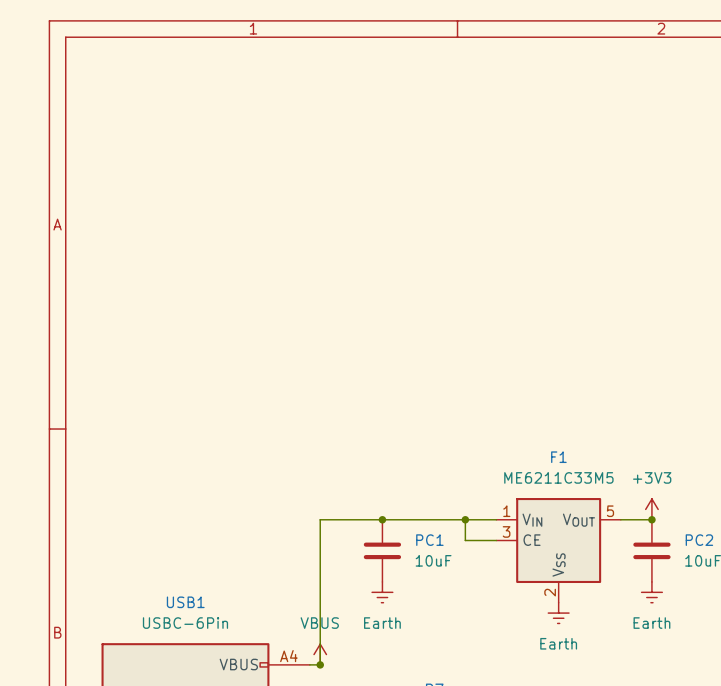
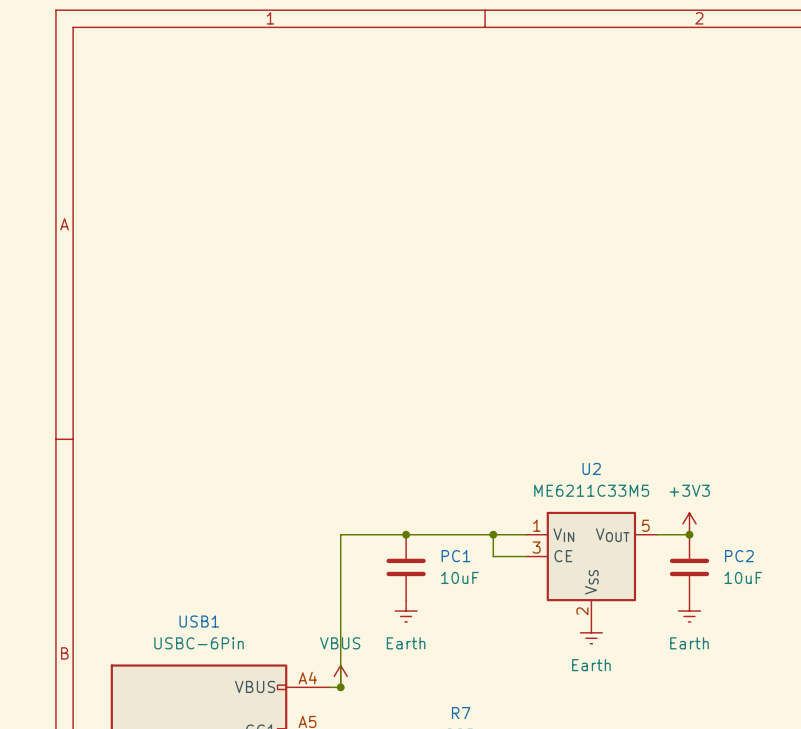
F1 name: F1 (558, 457) -> U2 (591, 468)

